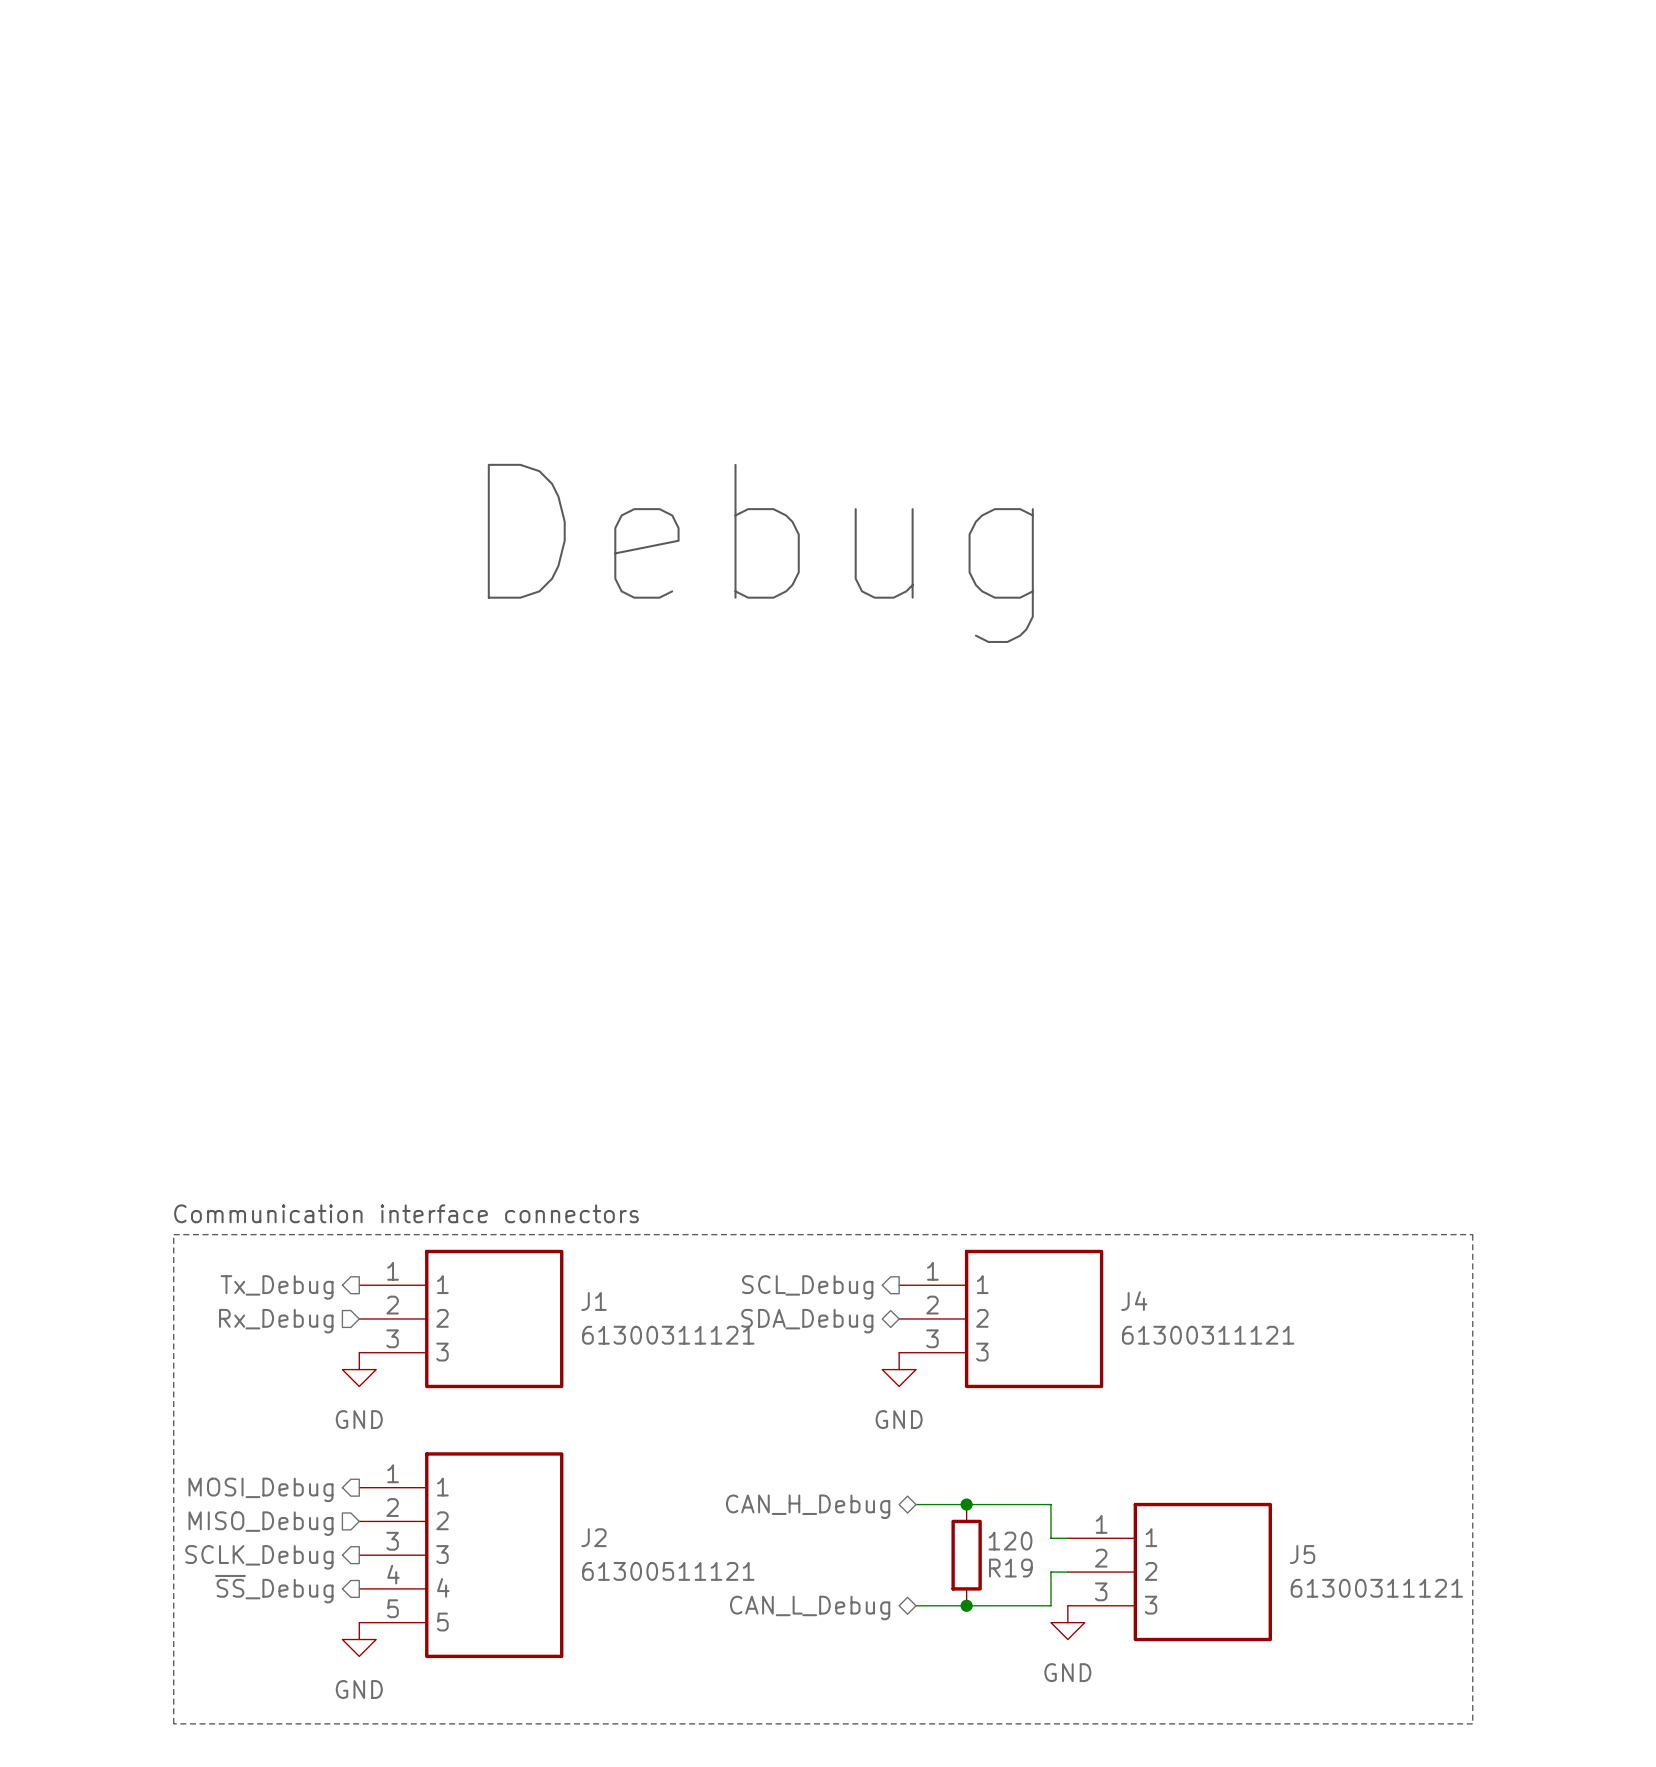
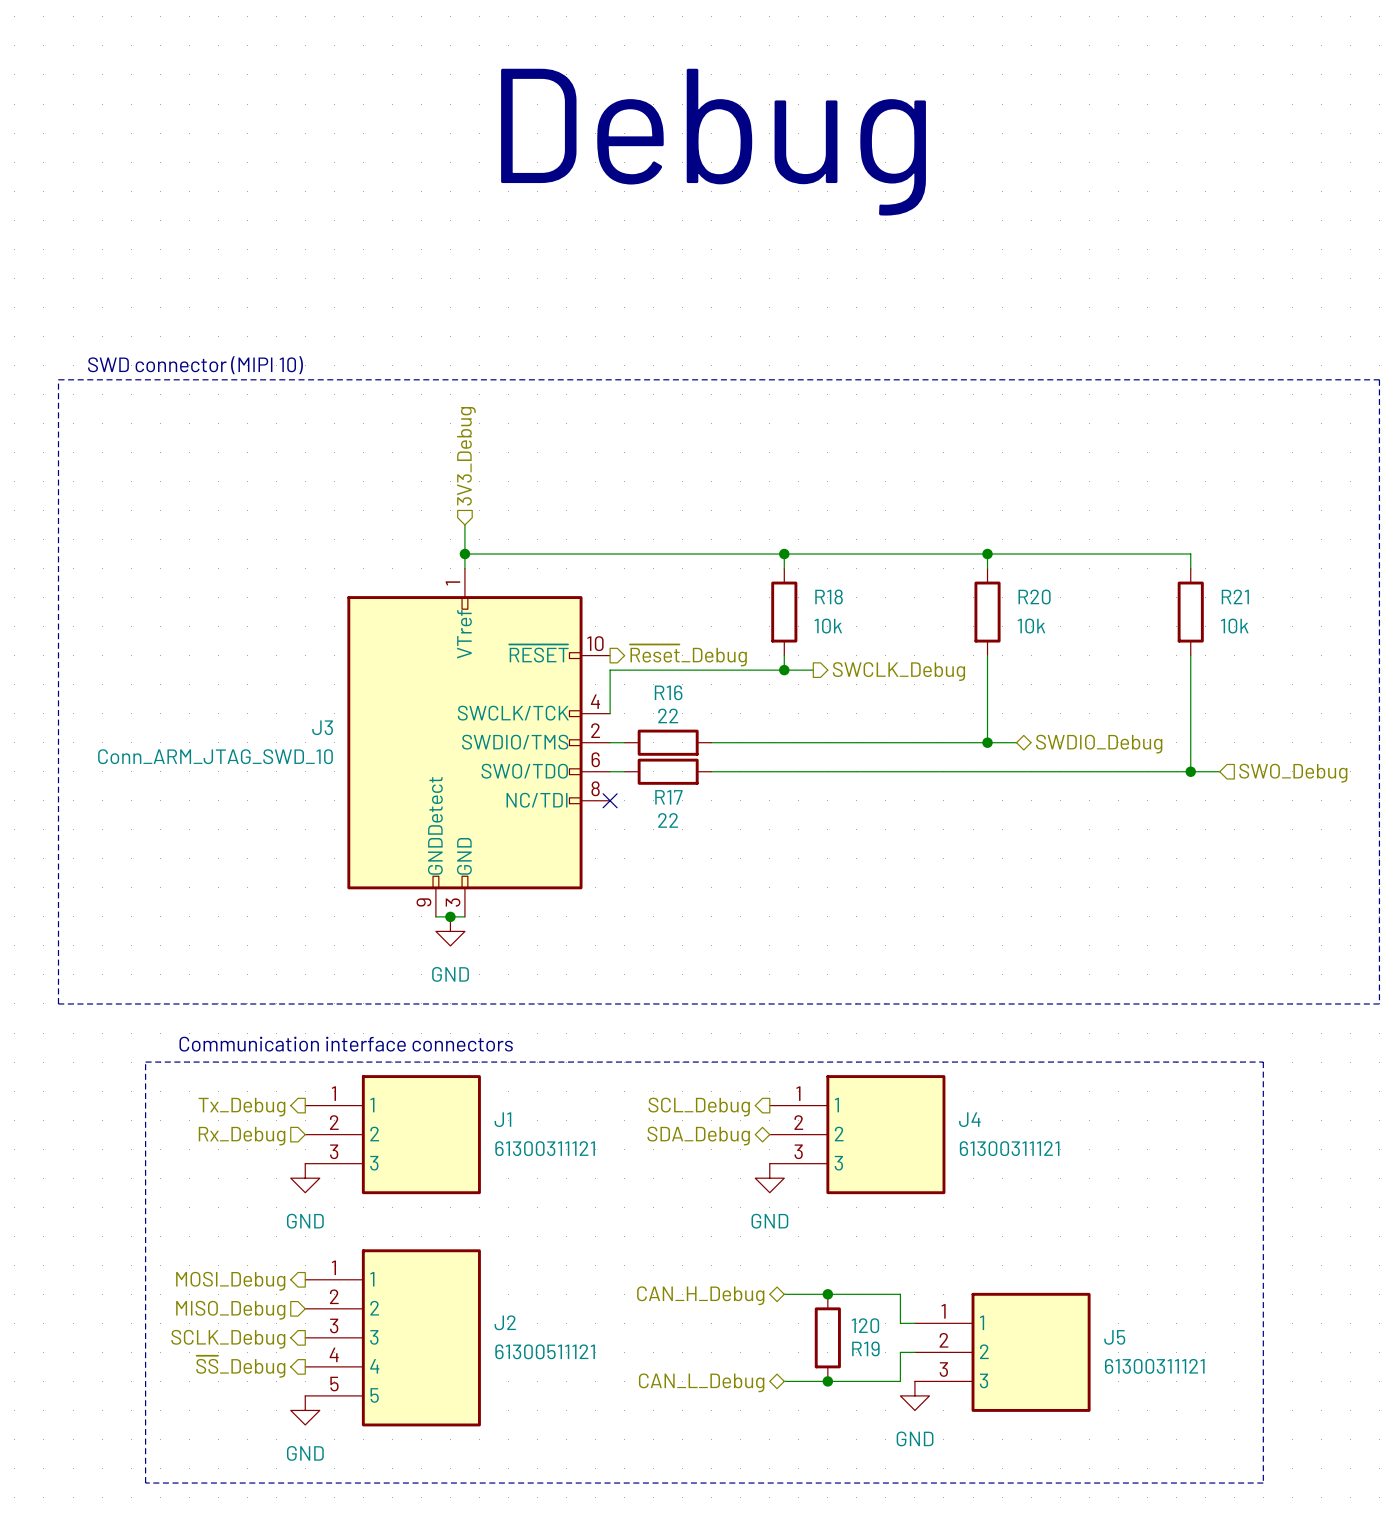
text: none -> Debug (713, 142)
text: none -> SWD connector (MIPI 10) (195, 365)
line: none -> (58, 379) (1379, 379) (1379, 1003) (58, 1003) (58, 379)
hierarchical label: none -> 3V3_Debug (466, 456)
text: Debug (760, 553) -> none
wire: none -> (464, 524) (464, 568)
wire: none -> (464, 554) (1190, 554) (1190, 568)
junction: none -> (464, 554)
wire: none -> (784, 554) (784, 568)
junction: none -> (784, 554)
wire: none -> (987, 554) (987, 568)
junction: none -> (987, 554)
R18: none -> 10k (784, 612)
R20: none -> 10k (987, 612)
R21: none -> 10k (1190, 612)
hierarchical label: none -> ~{Reset}_Debug (688, 655)
wire: none -> (784, 655) (784, 670)
wire: none -> (987, 655) (987, 742)
wire: none -> (1190, 655) (1190, 771)
junction: none -> (784, 670)
wire: none -> (813, 670) (610, 670) (610, 713)
hierarchical label: none -> SWCLK_Debug (898, 671)
J3: none -> Conn_ARM_JTAG_SWD_10 (478, 742)
wire: none -> (610, 742) (624, 742)
R16: none -> 22 (668, 742)
wire: none -> (711, 742) (1016, 742)
junction: none -> (987, 742)
hierarchical label: none -> SWDIO_Debug (1099, 744)
wire: none -> (610, 771) (624, 771)
R17: none -> 22 (668, 771)
wire: none -> (711, 771) (1219, 771)
junction: none -> (1190, 771)
hierarchical label: none -> SWO_Debug (1293, 773)
no-connect mark: none -> (610, 800)
wire: none -> (435, 916) (464, 916)
junction: none -> (450, 916)
power symbol: none -> GND (450, 931)

